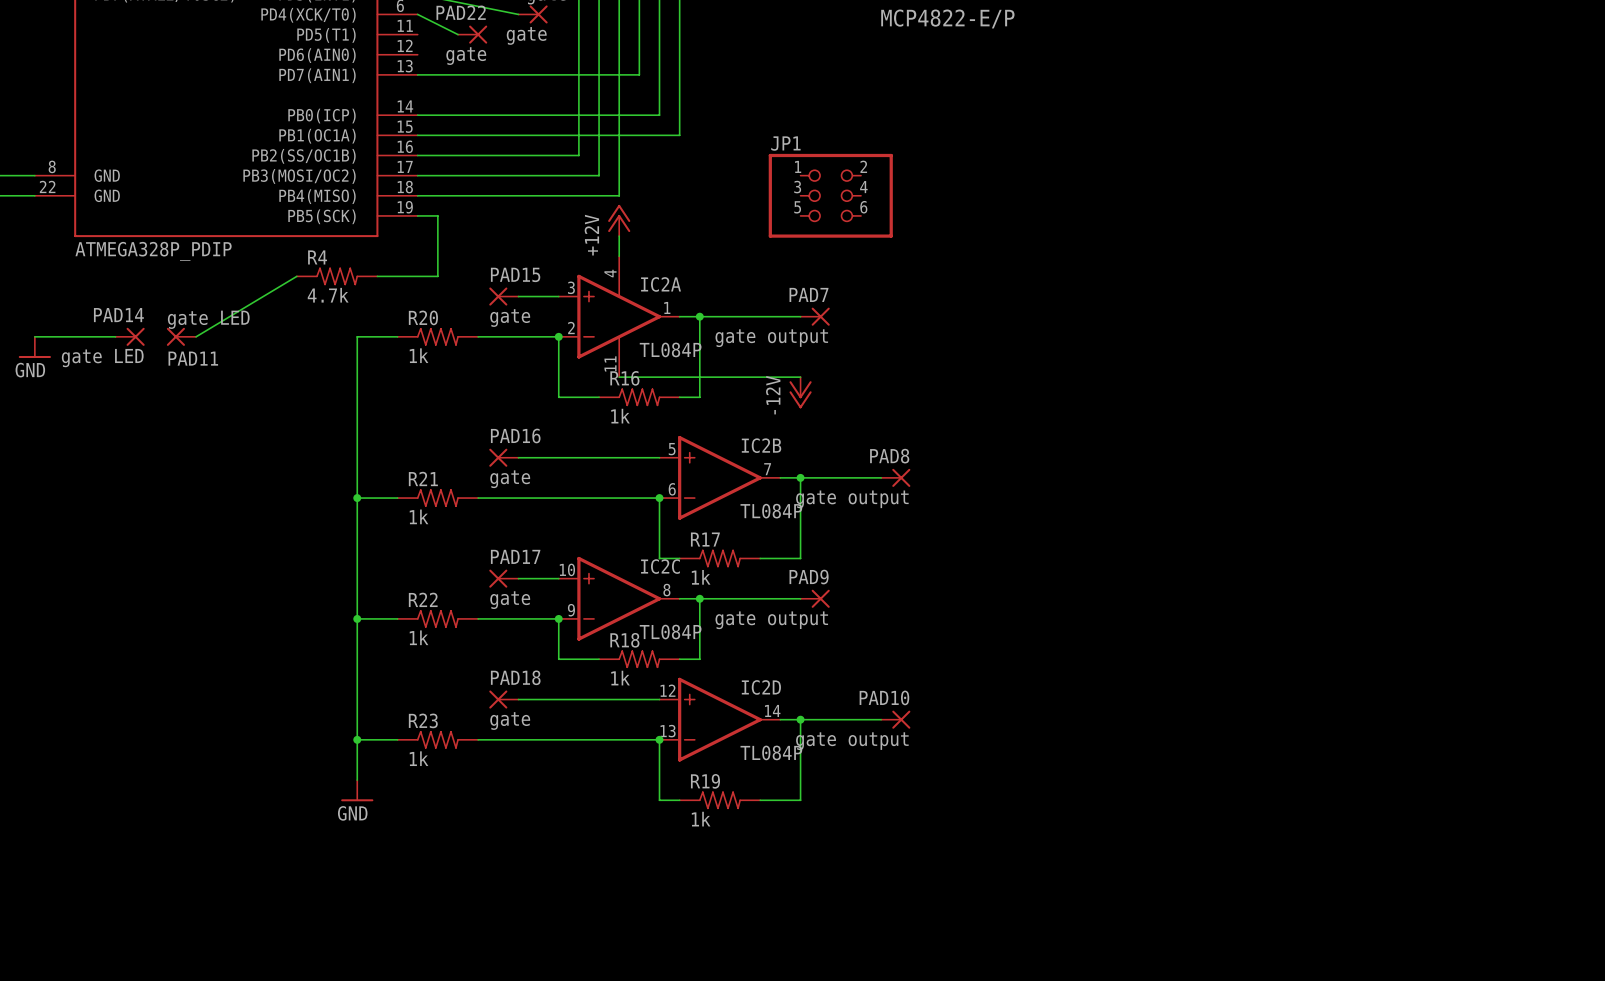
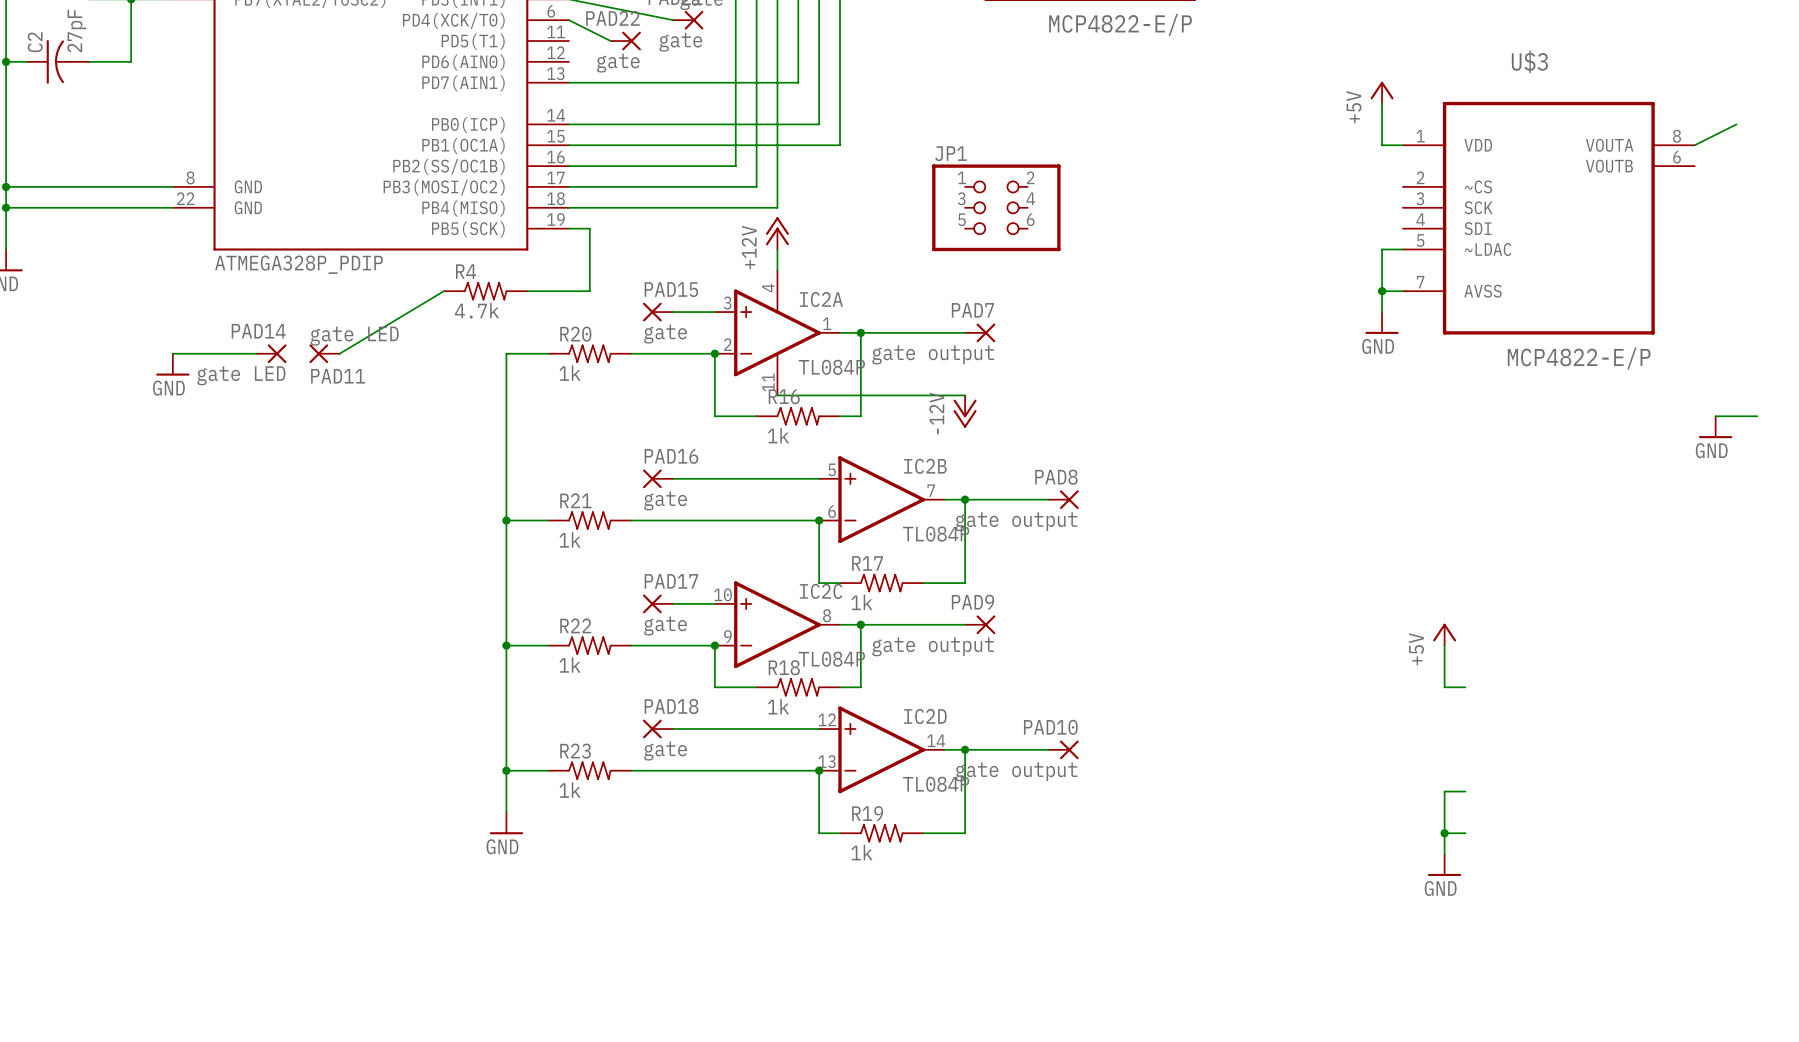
power symbol: none -> +5V (1382, 92)
wire: none -> (1382, 103) (1382, 145) (1402, 145)
wire: none -> (1736, 124) (1694, 145)
U$3: none -> MCP4822-E/P (1548, 218)
wire: none -> (1402, 249) (1382, 249) (1382, 312)
wire: none -> (1382, 291) (1402, 291)
junction: none -> (1382, 291)
power symbol: none -> GND (1382, 322)
wire: none -> (1715, 416) (1757, 416)
power symbol: none -> GND (1715, 427)
power symbol: none -> +5V (1444, 634)
wire: none -> (1444, 645) (1444, 687) (1465, 687)
wire: none -> (1465, 791) (1444, 791) (1444, 854)
wire: none -> (1444, 833) (1465, 833)
junction: none -> (1444, 833)
power symbol: none -> GND (1444, 865)

